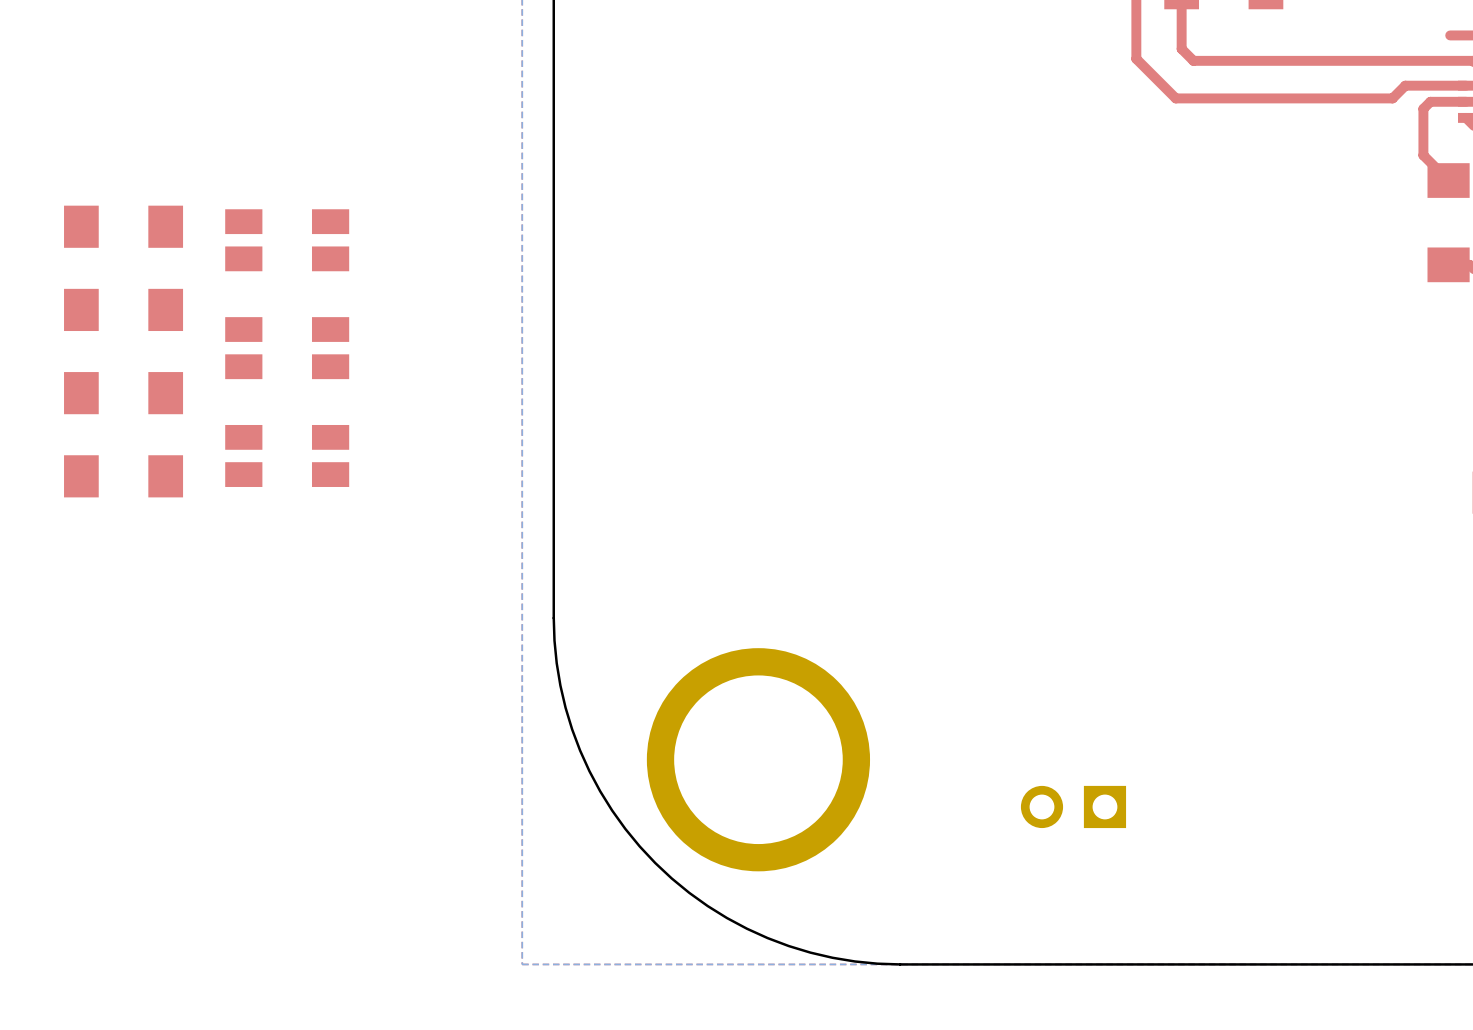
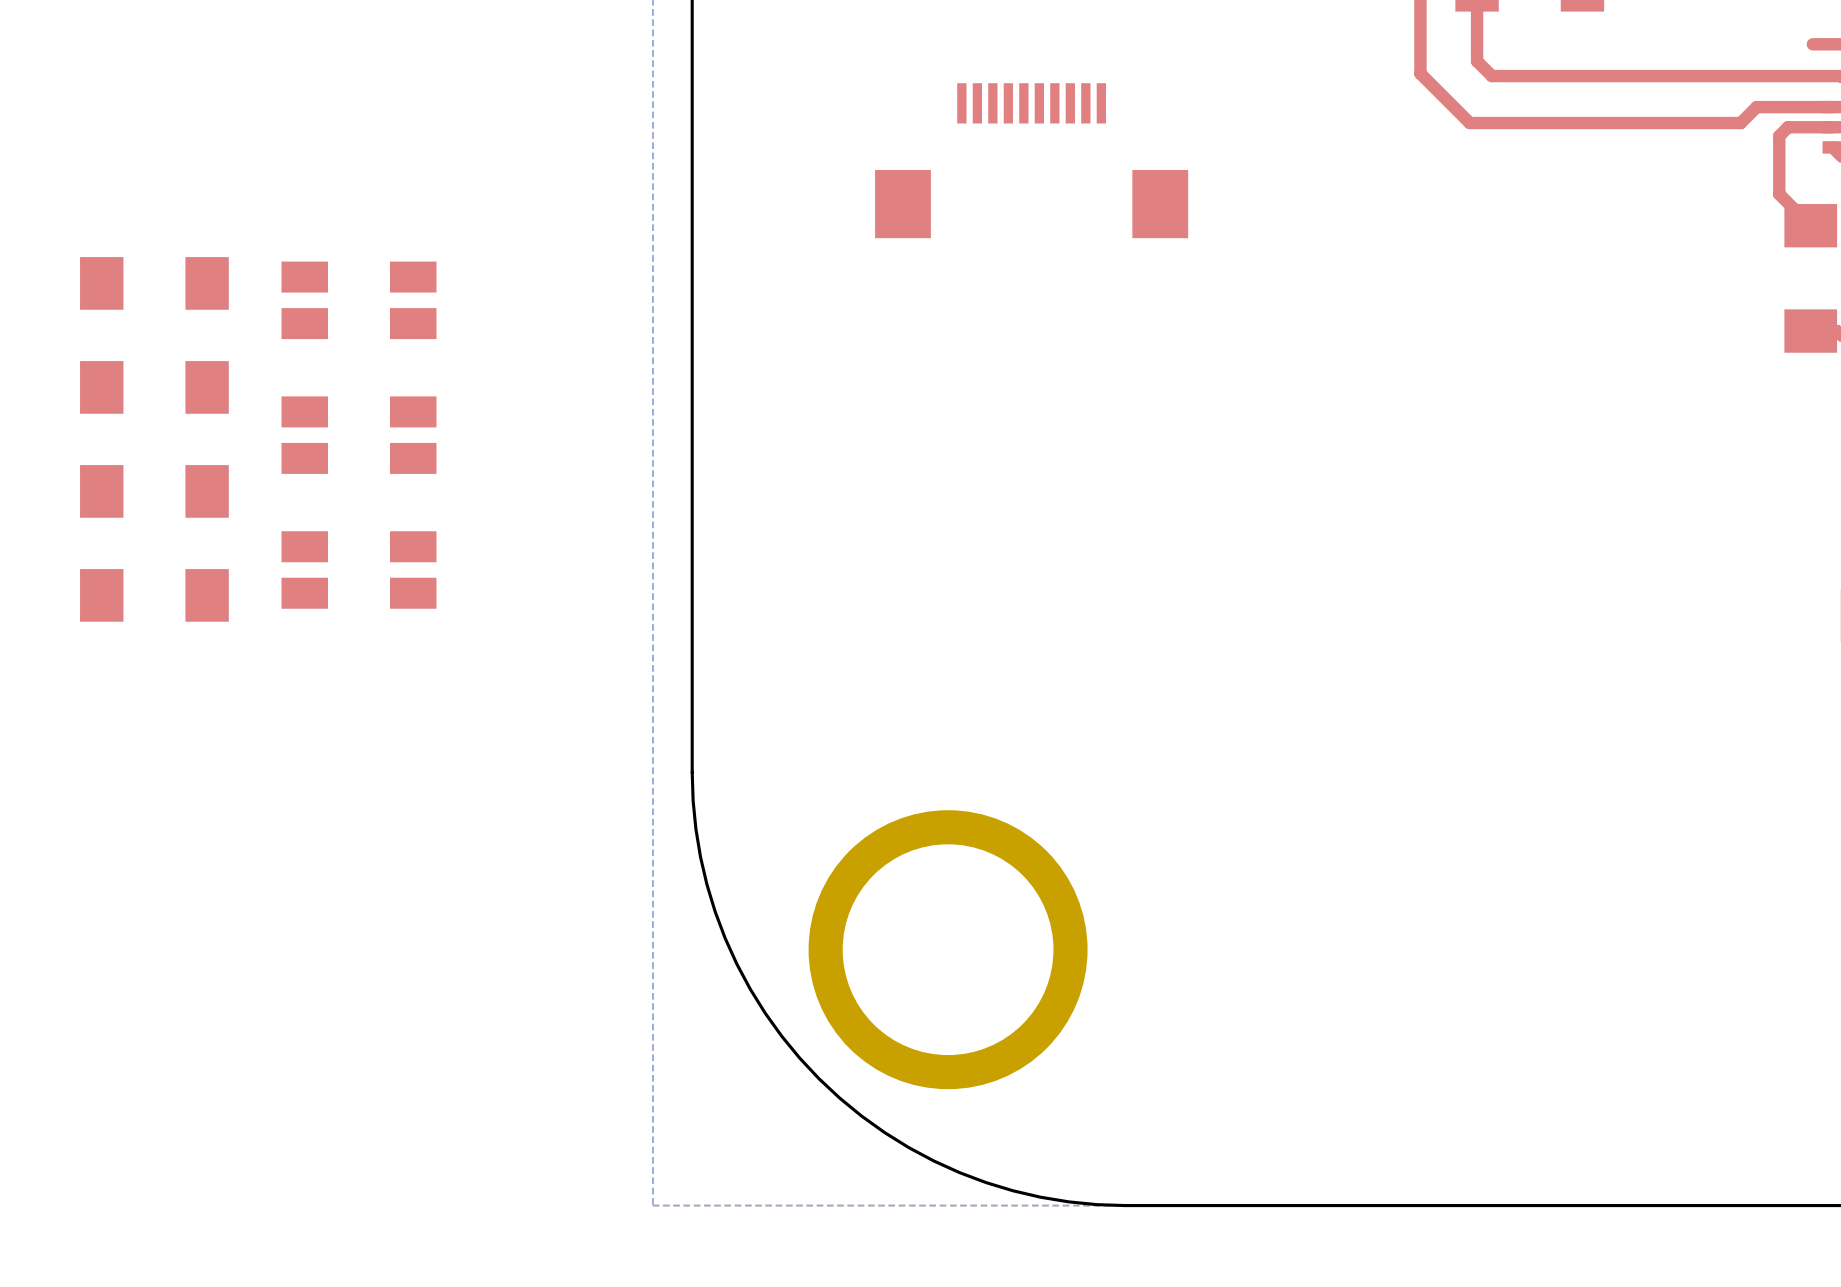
part: none -> (1031, 160)
part: (1073, 806) -> none

